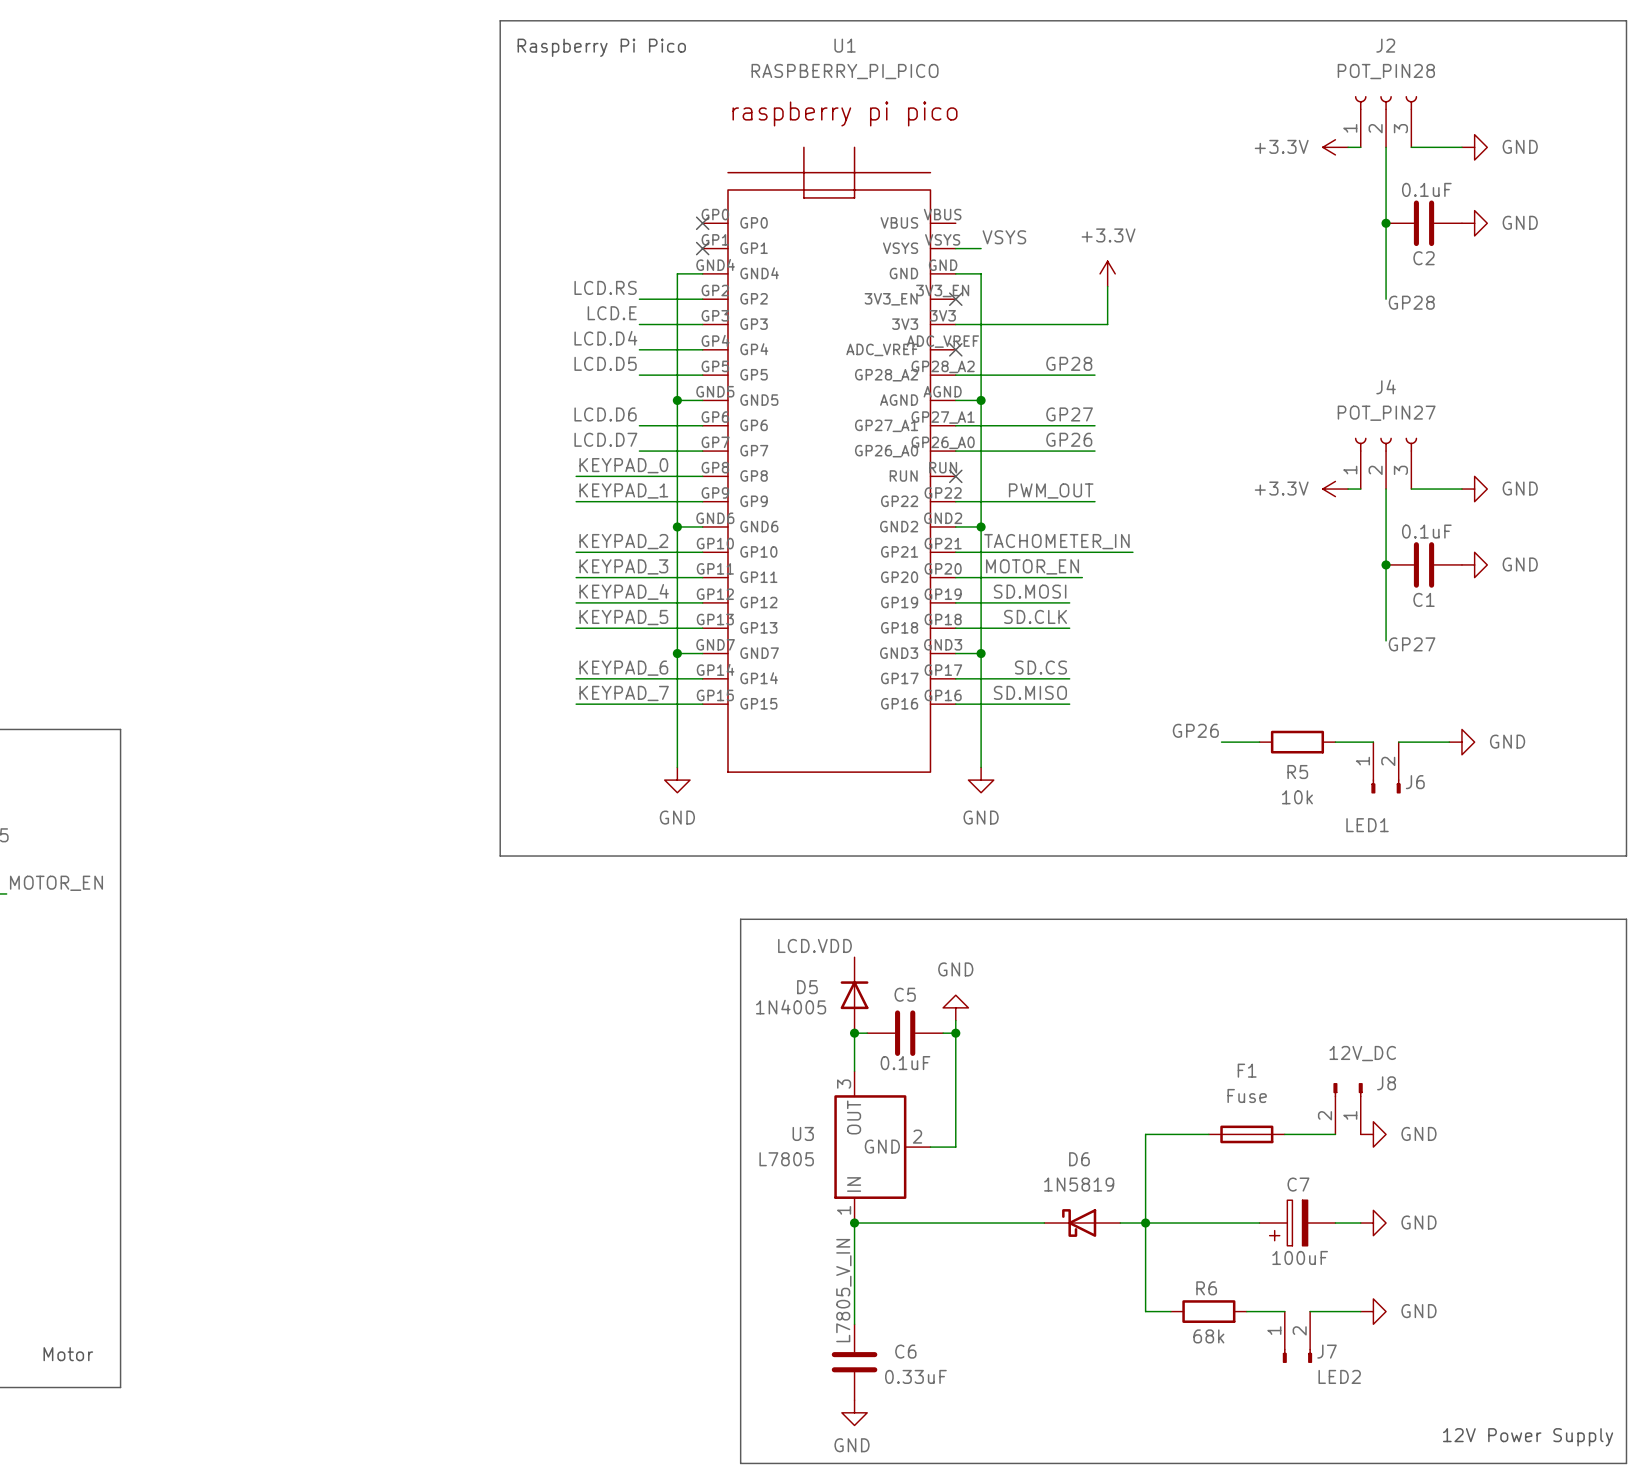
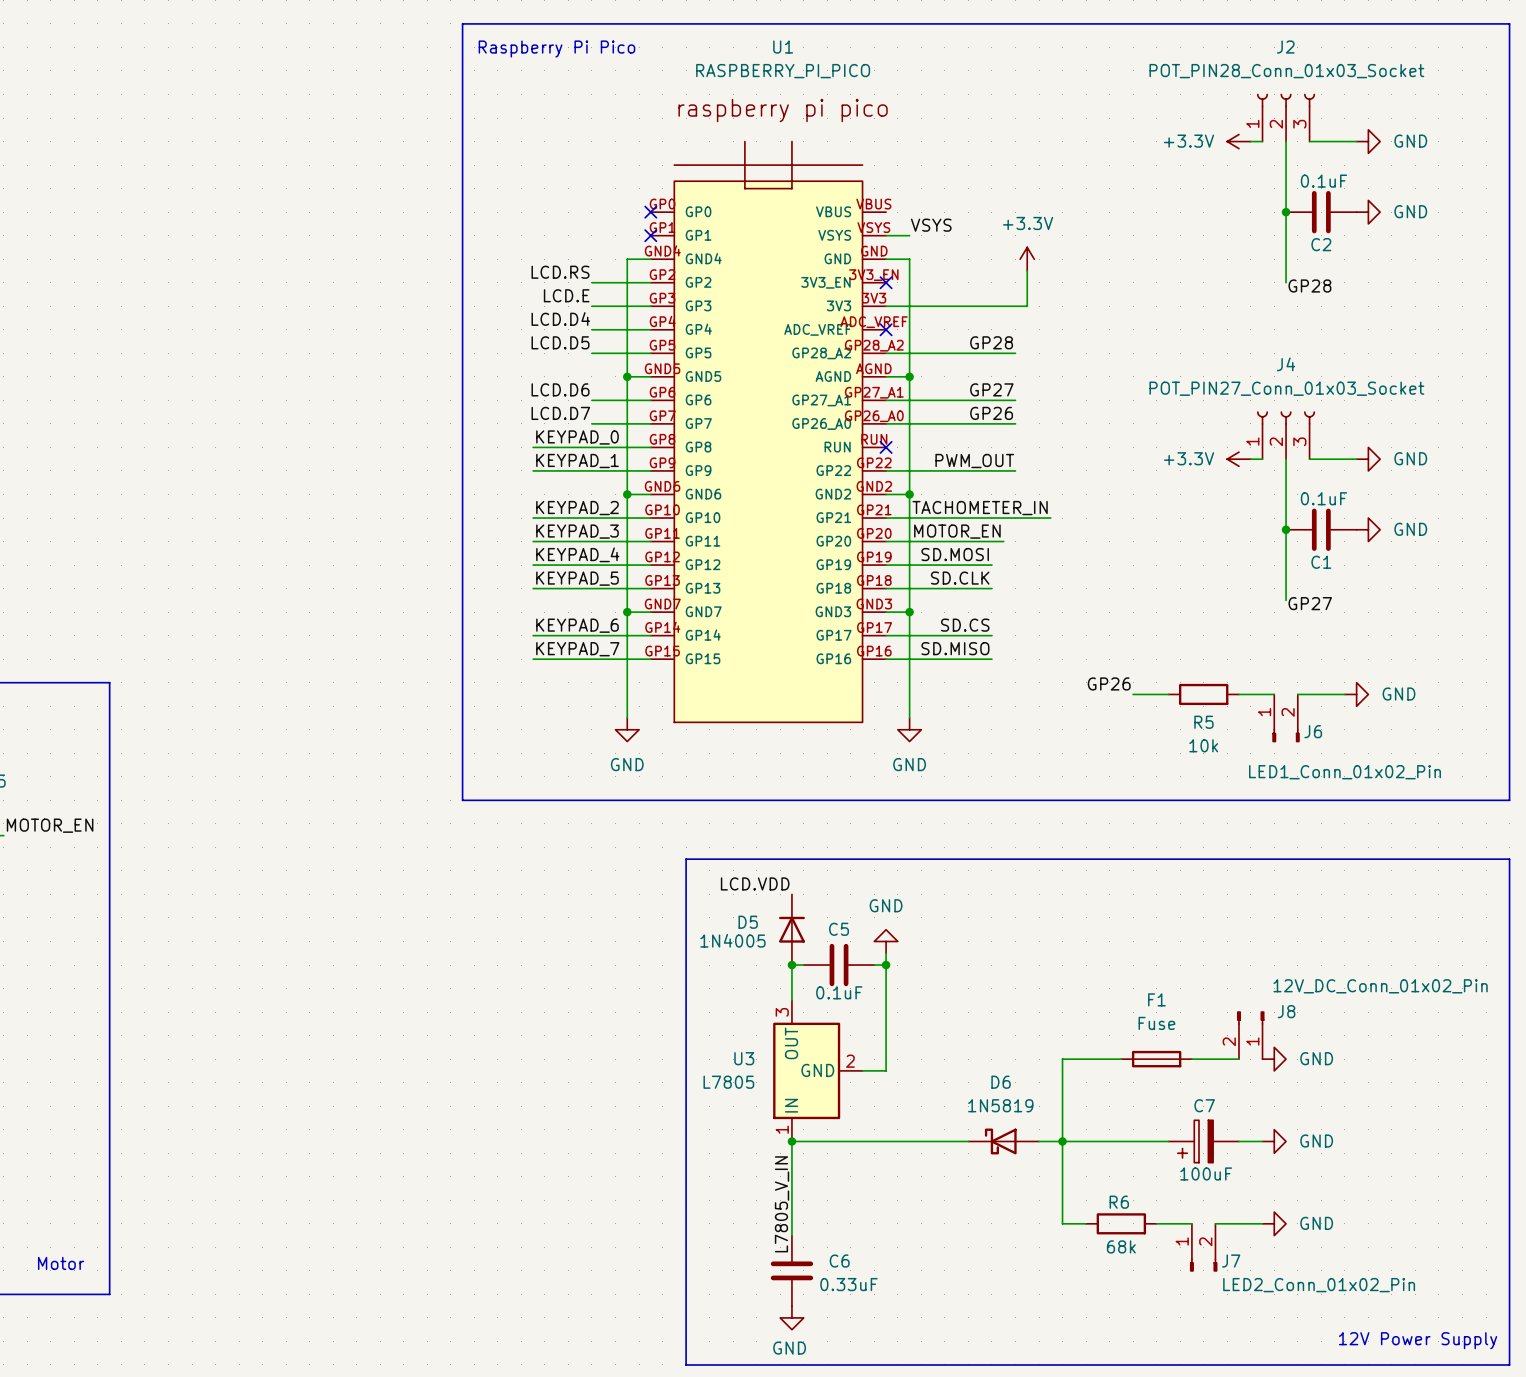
J2 value: POT_PIN28 (1386, 71) -> POT_PIN28_Conn_01x03_Socket (1286, 71)
J4 value: POT_PIN27 (1386, 413) -> POT_PIN27_Conn_01x03_Socket (1286, 388)
J6 value: LED1 (1367, 825) -> LED1_Conn_01x02_Pin (1345, 772)
J8 value: 12V_DC (1362, 1053) -> 12V_DC_Conn_01x02_Pin (1380, 986)
J7 value: LED2 (1339, 1376) -> LED2_Conn_01x02_Pin (1319, 1285)

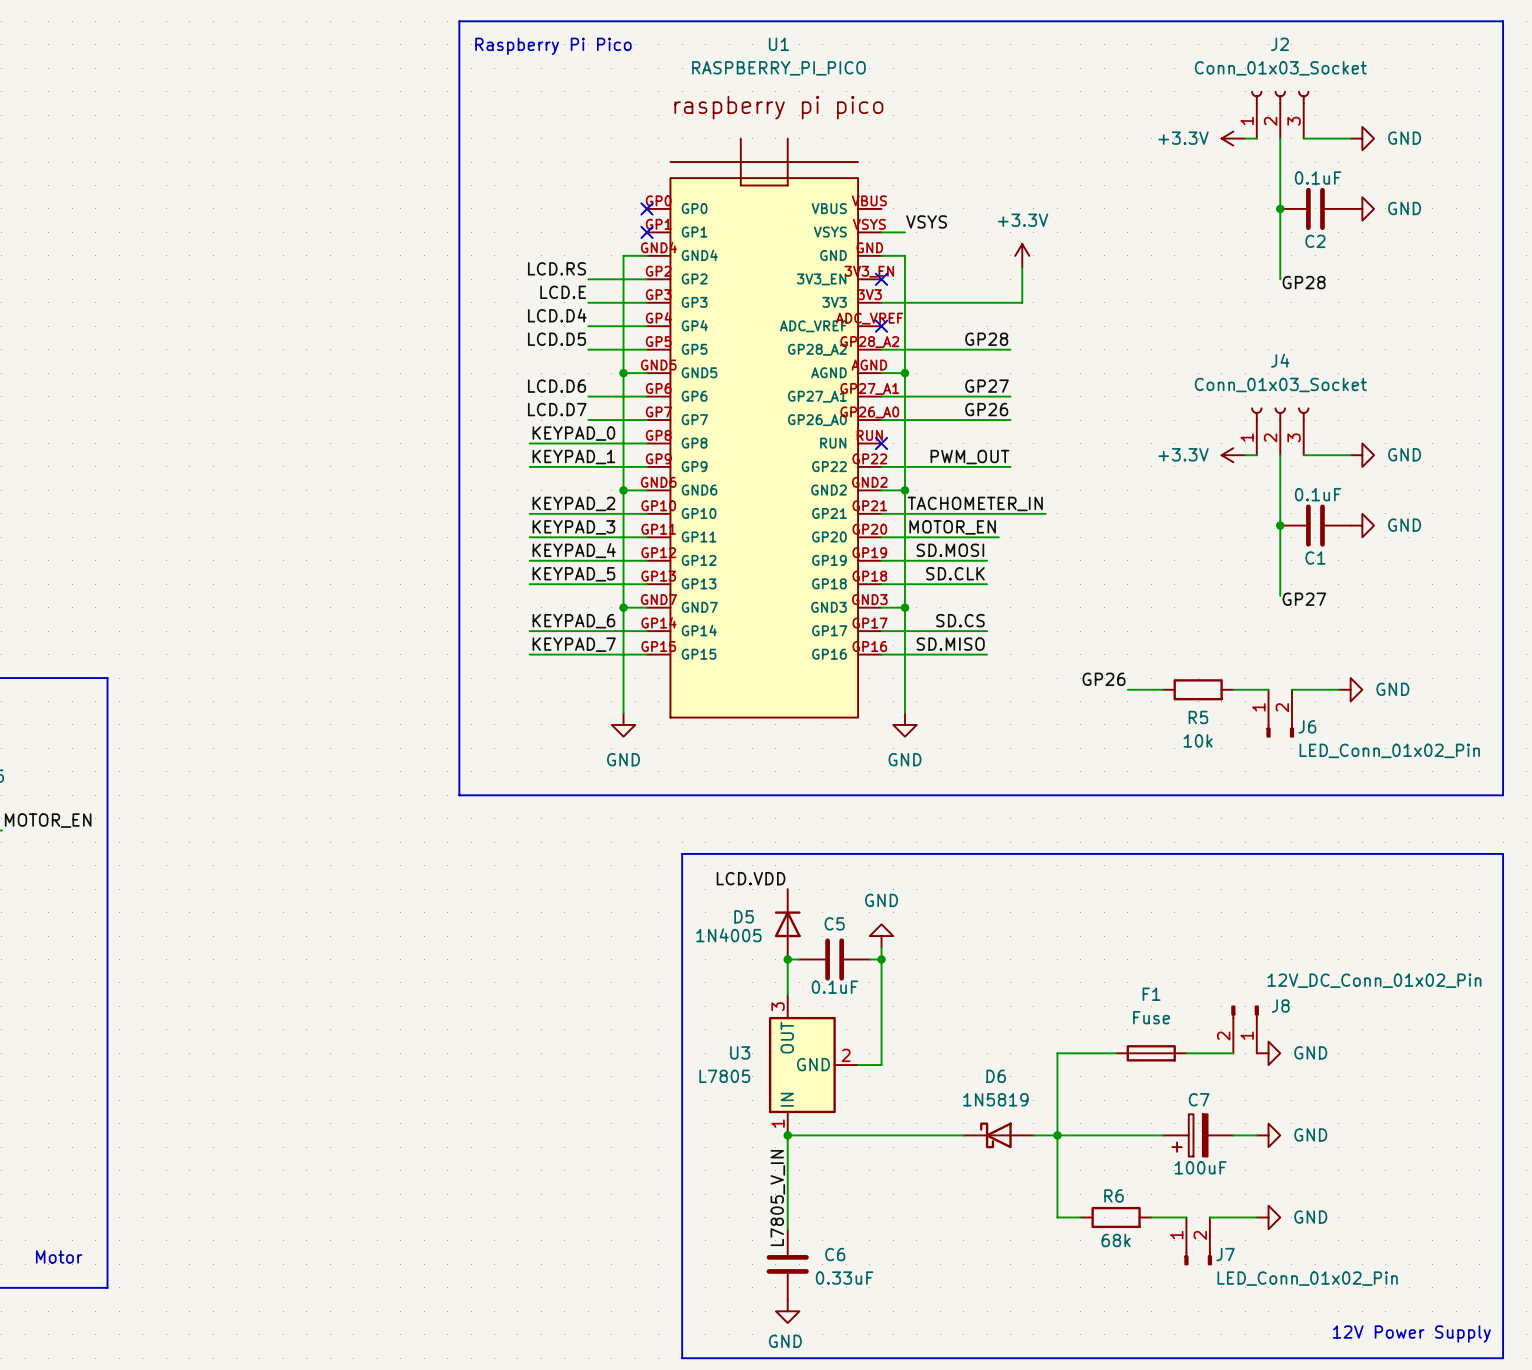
J2 value: POT_PIN28_Conn_01x03_Socket (1286, 71) -> Conn_01x03_Socket (1280, 68)
J4 value: POT_PIN27_Conn_01x03_Socket (1286, 388) -> Conn_01x03_Socket (1280, 384)
J6 value: LED1_Conn_01x02_Pin (1345, 772) -> LED_Conn_01x02_Pin (1389, 750)
J7 value: LED2_Conn_01x02_Pin (1319, 1285) -> LED_Conn_01x02_Pin (1307, 1278)

